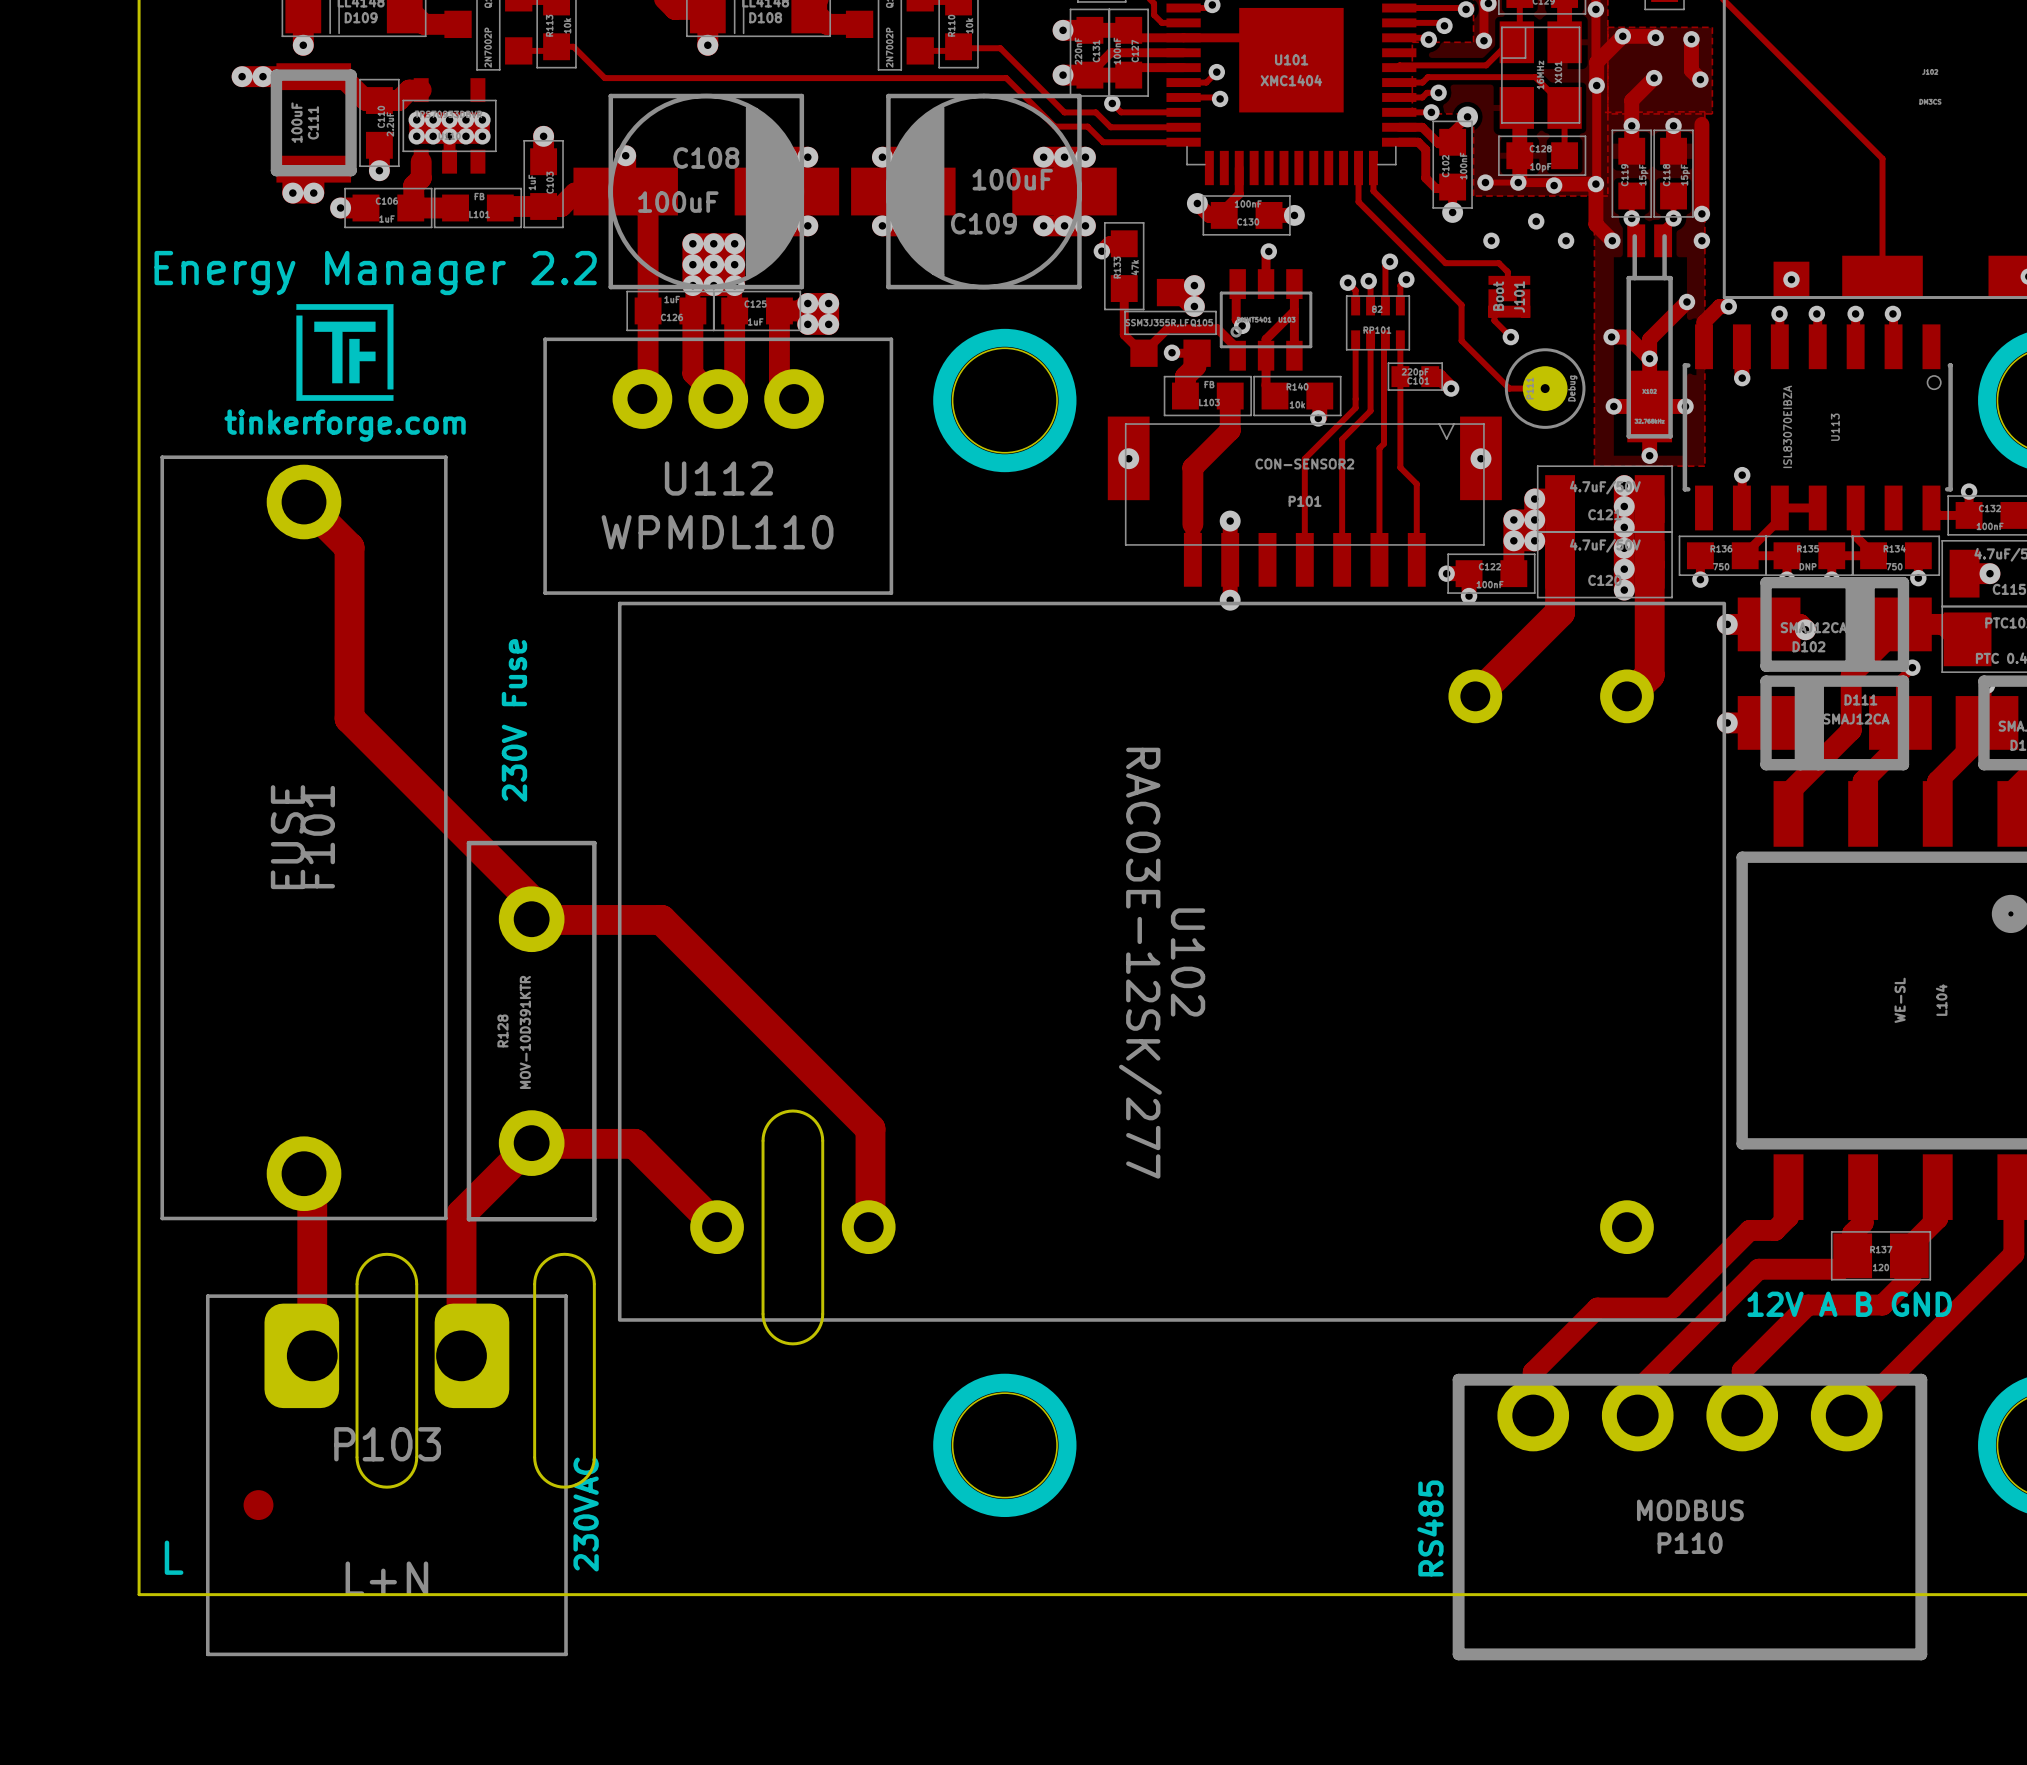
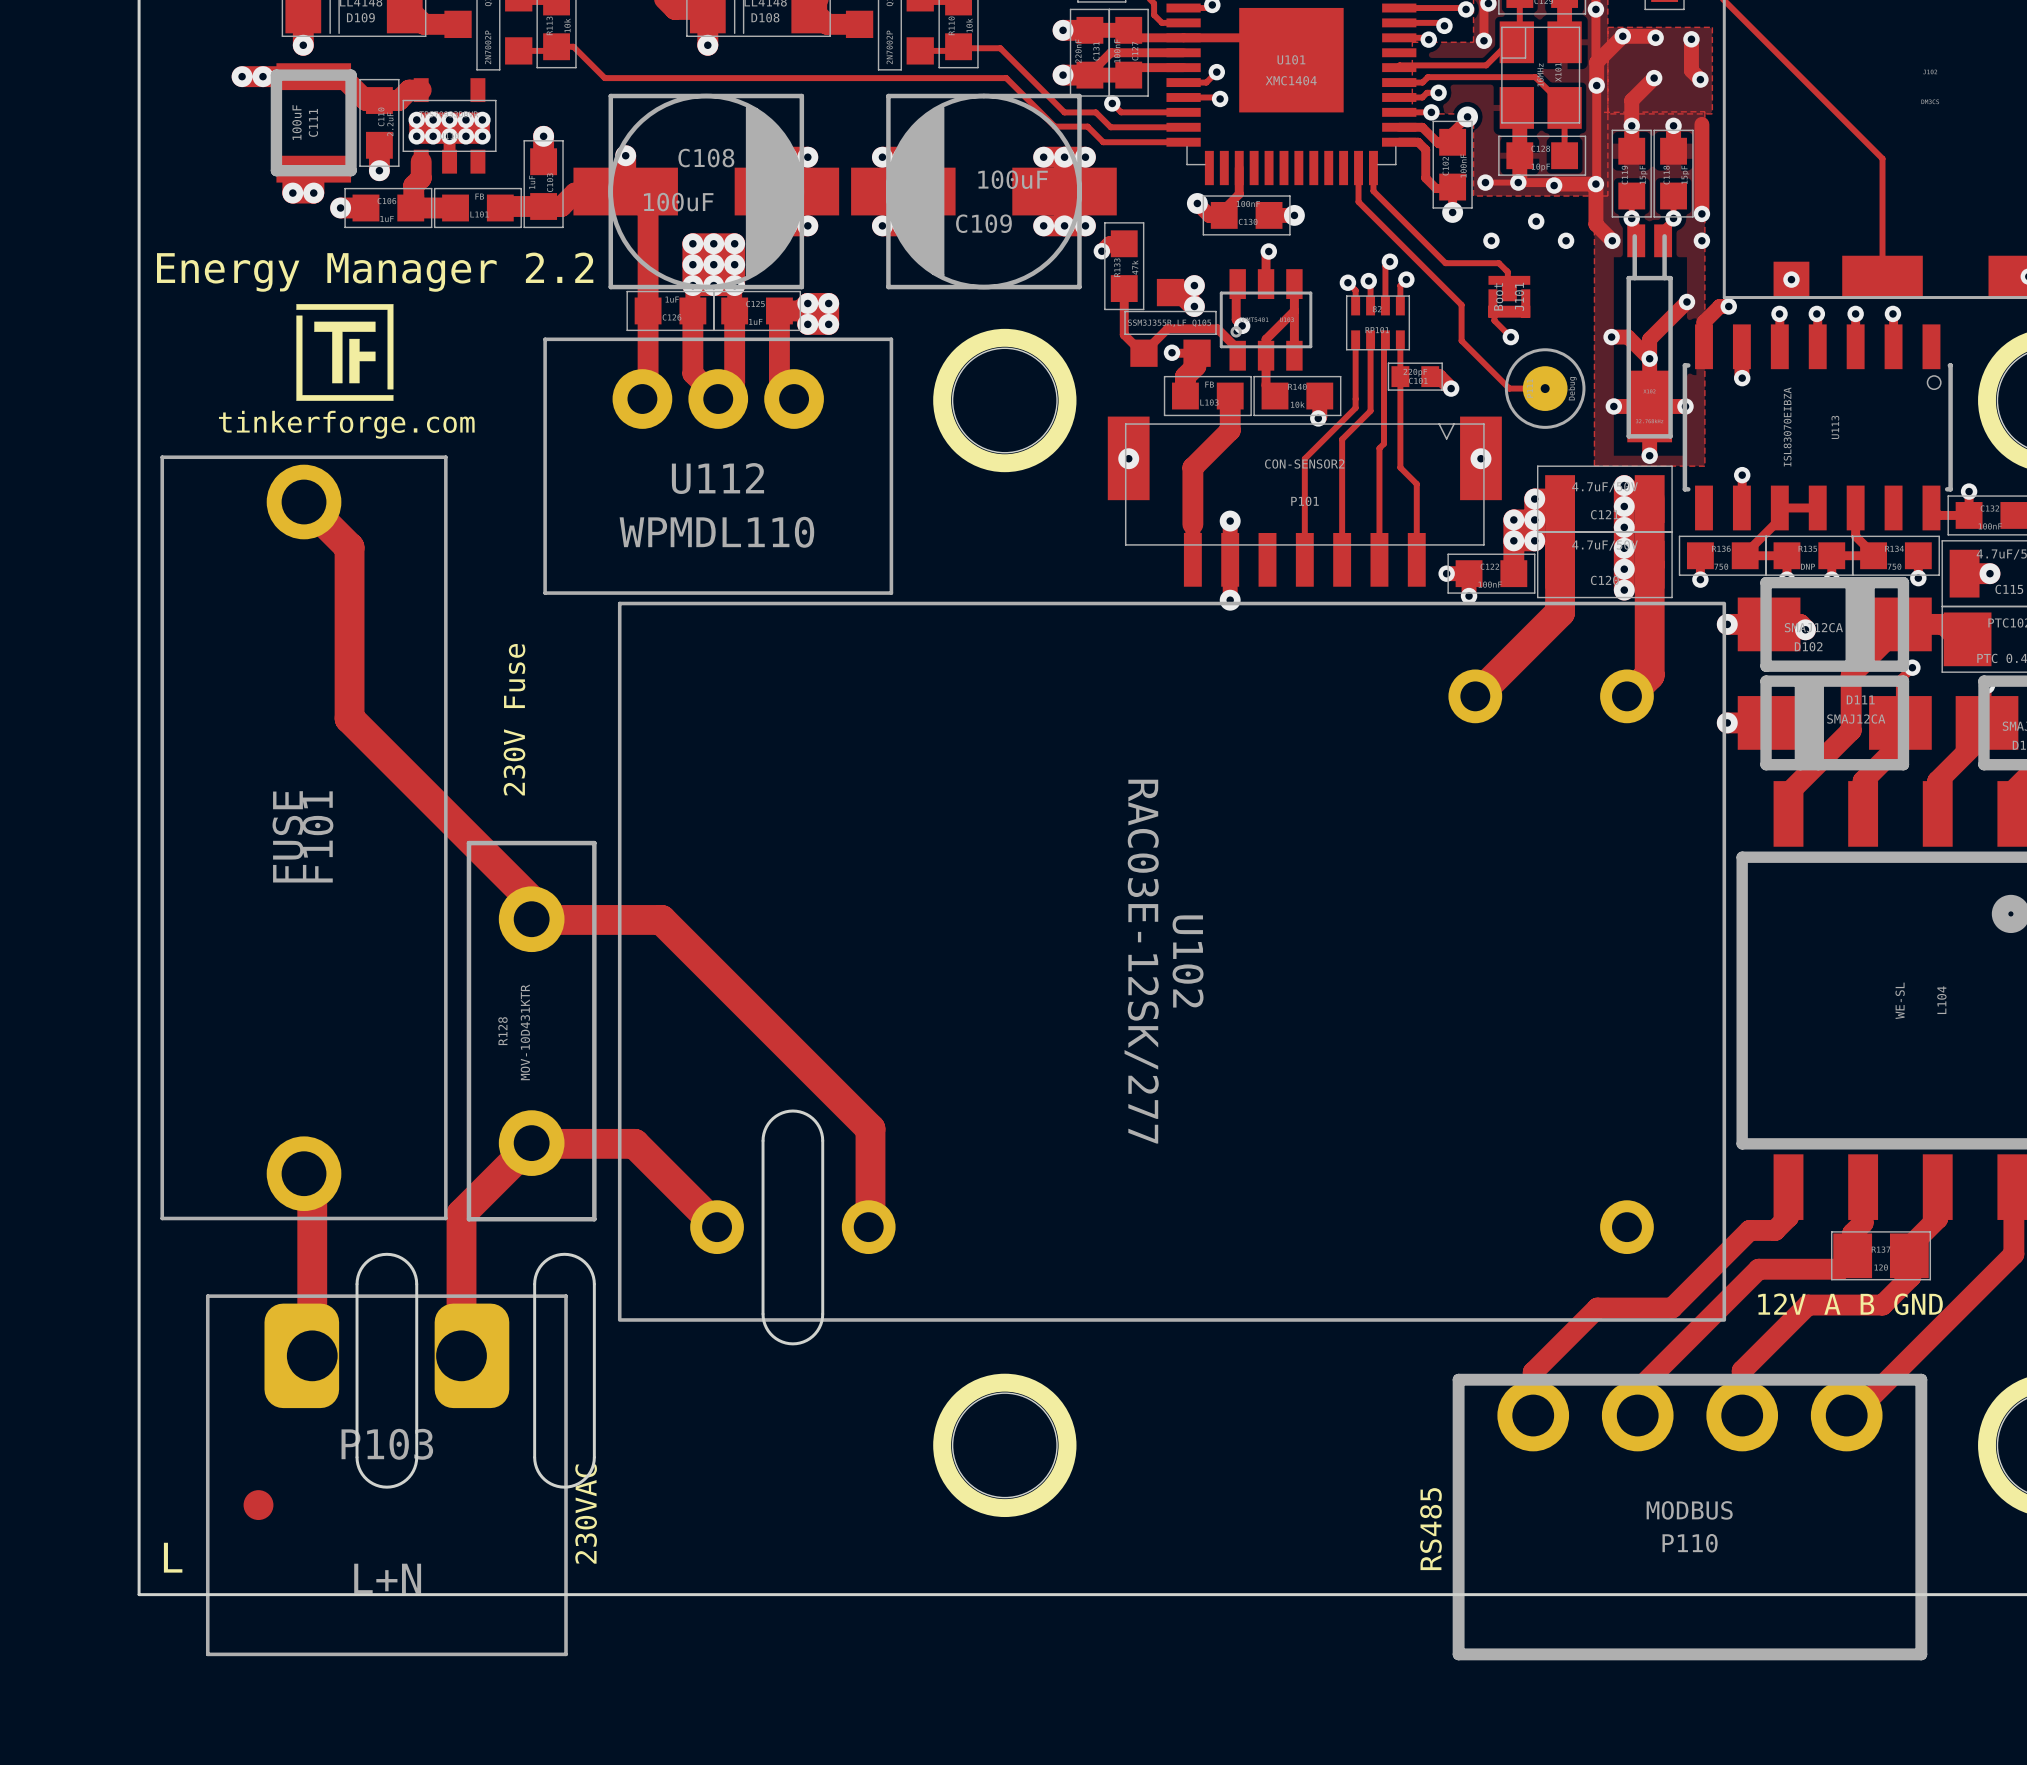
R128 value: MOV-10D391KTR (525, 1032) -> MOV-10D431KTR (525, 1032)

